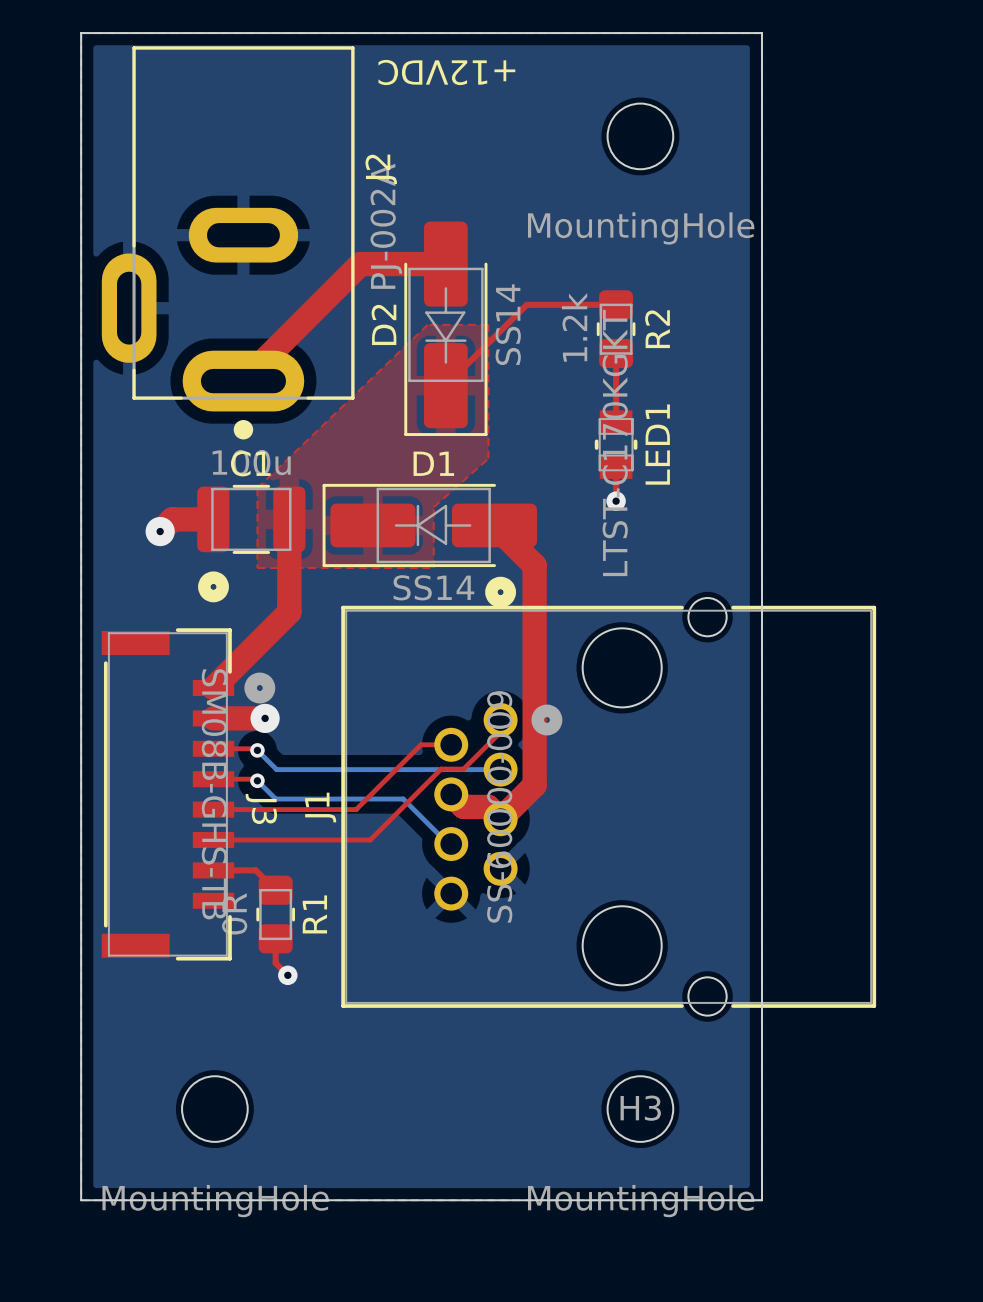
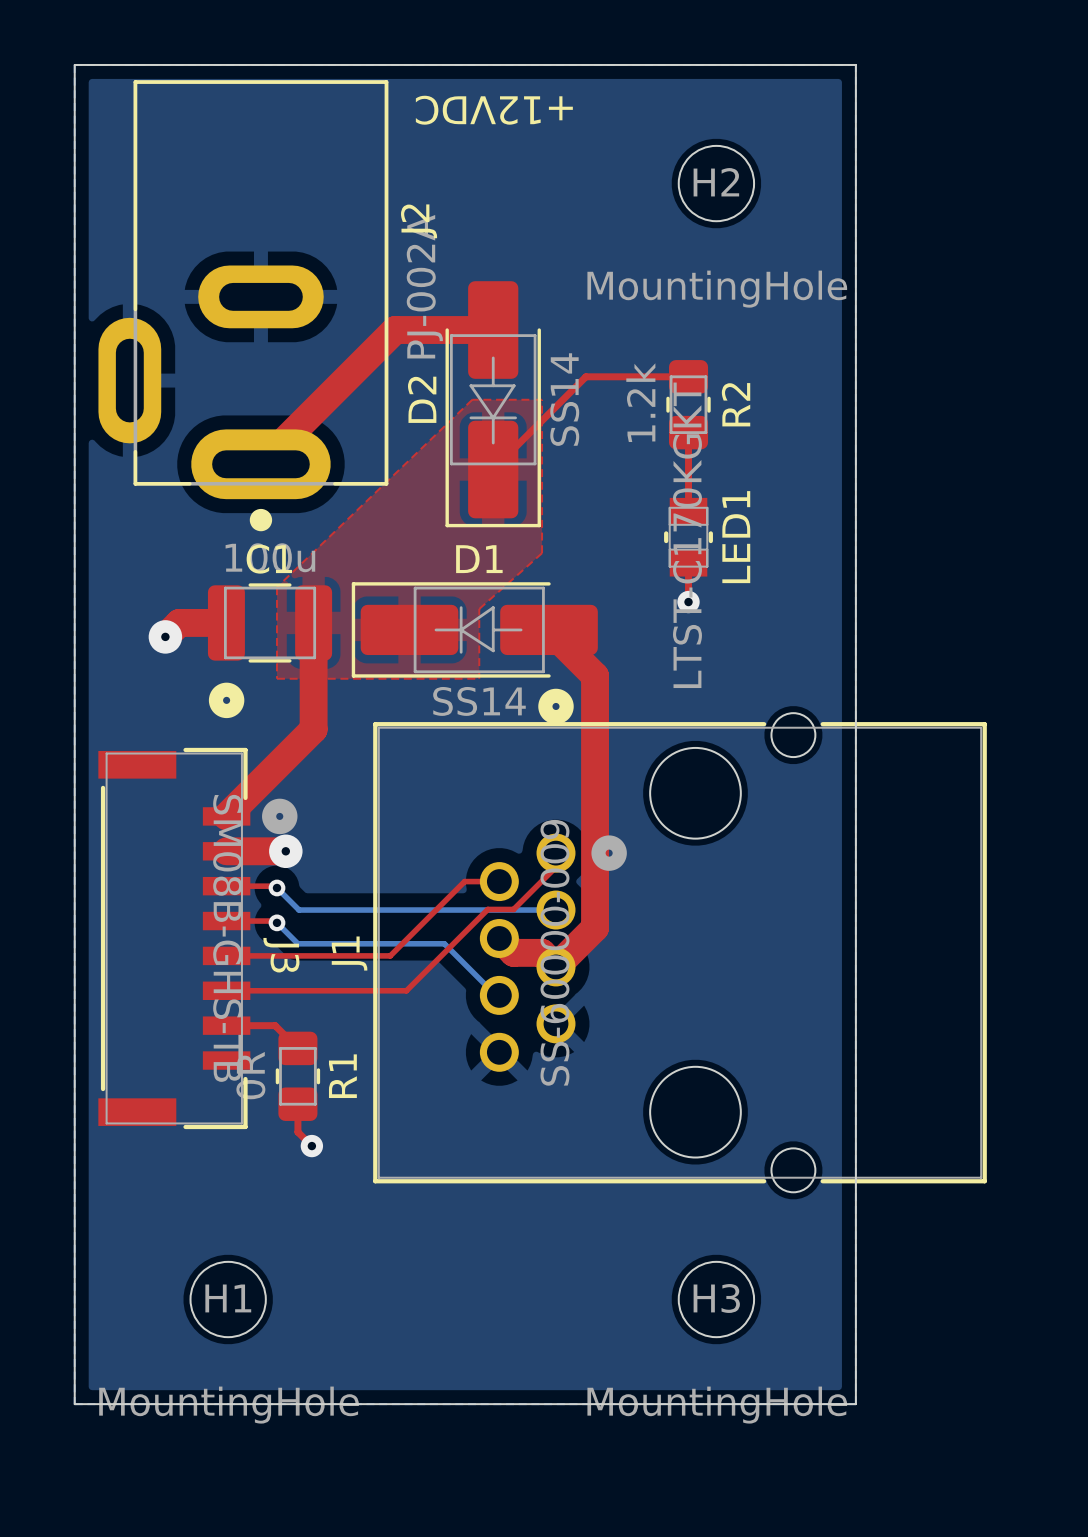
H2 name: none -> H2 (716, 182)
H1 name: none -> H1 (228, 1298)

